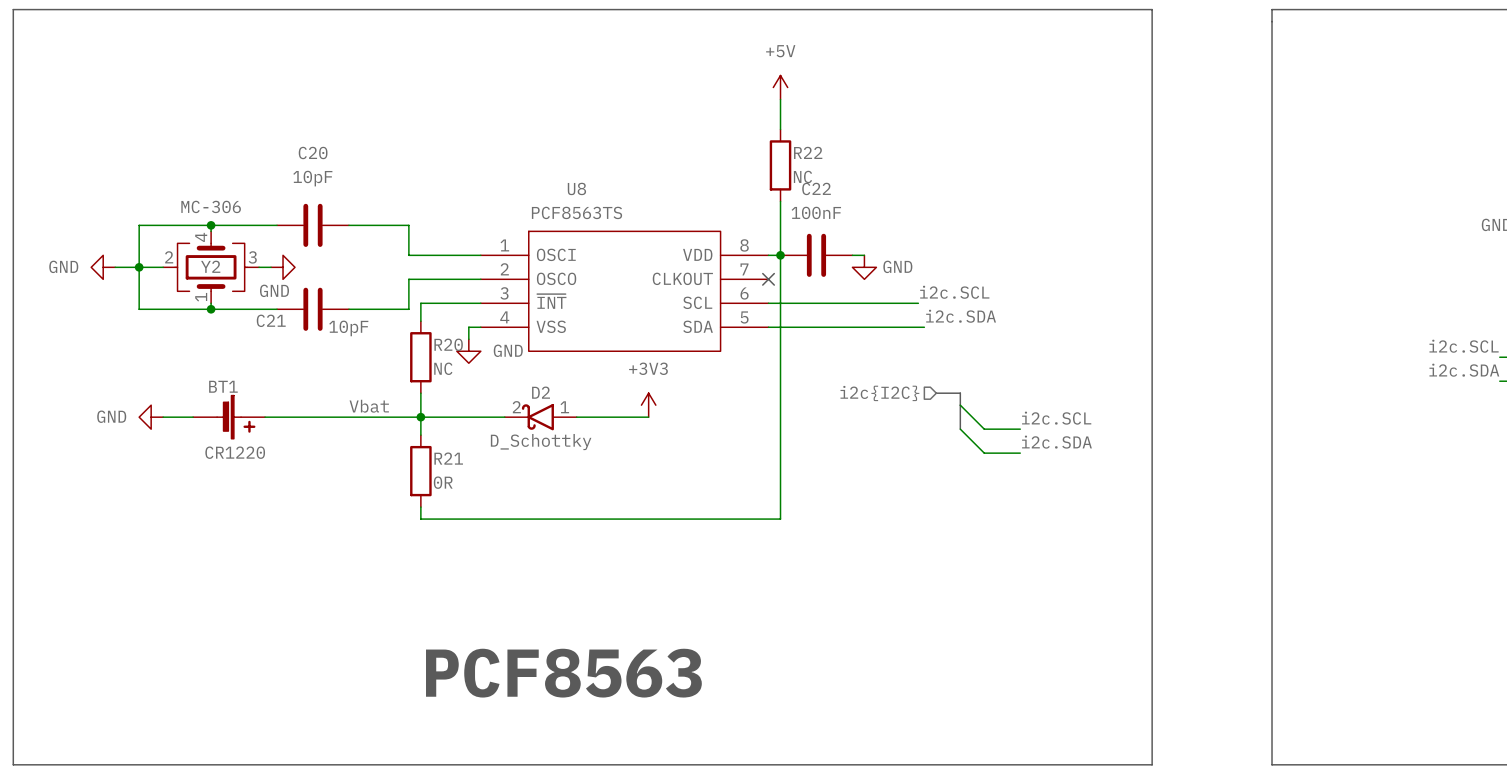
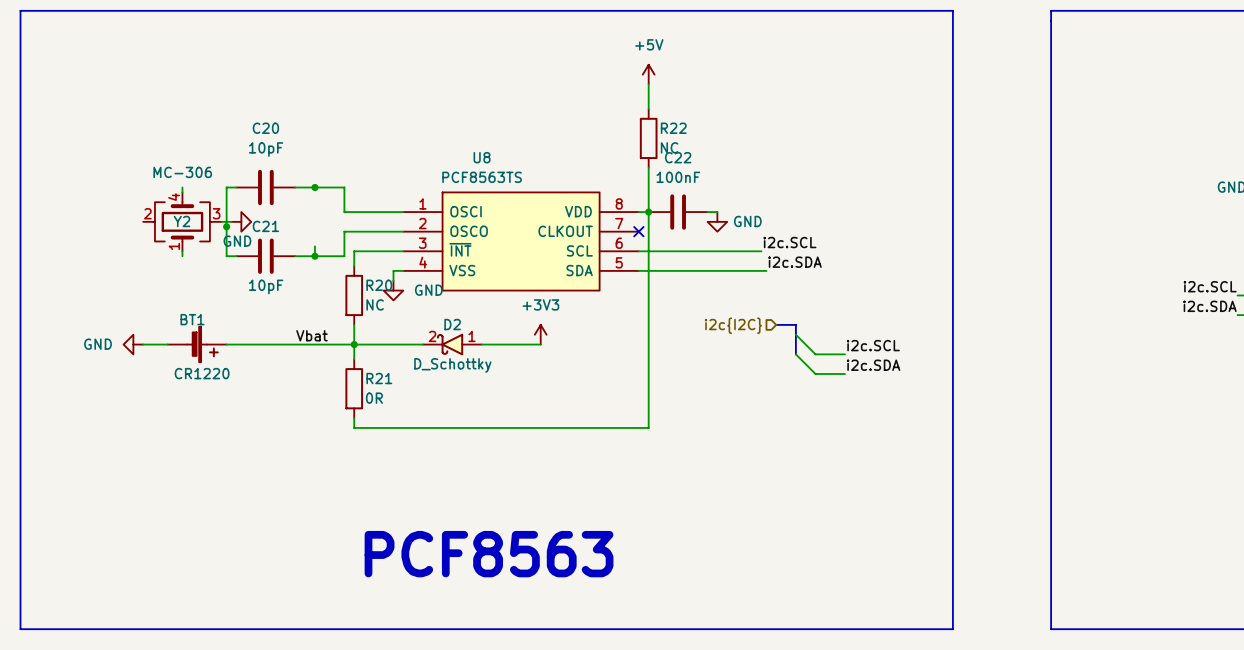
junction: (211, 225) -> none
wire: (265, 225) (139, 225) (139, 309) (265, 309) -> (226, 187) (226, 256)
junction: none -> (314, 187)
power symbol: GND (103, 267) -> none
wire: (115, 267) (163, 267) -> none
junction: (139, 267) -> none
junction: none -> (226, 226)
wire: none -> (314, 246) (314, 256)
junction: (211, 309) -> none
junction: none -> (314, 256)
C21 name position: C21 (271, 320) -> C21 (265, 226)
C21 value position: 10pF (348, 328) -> 10pF (266, 286)

